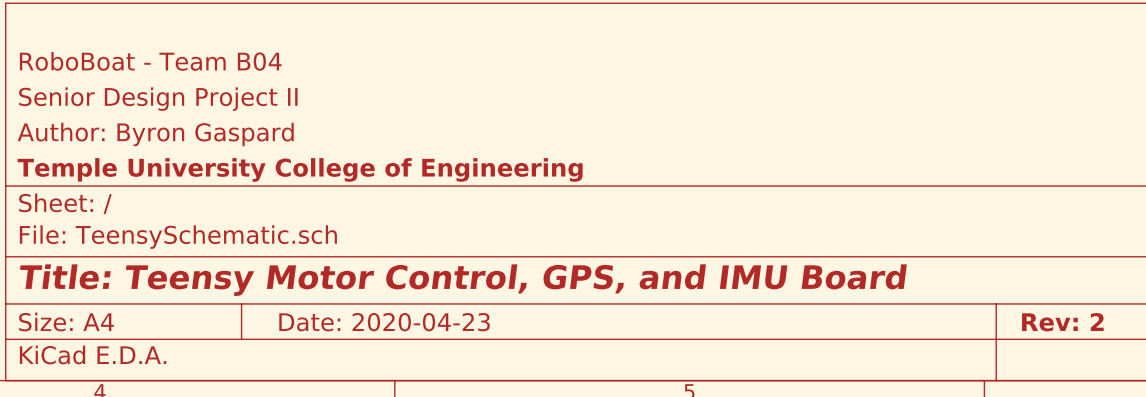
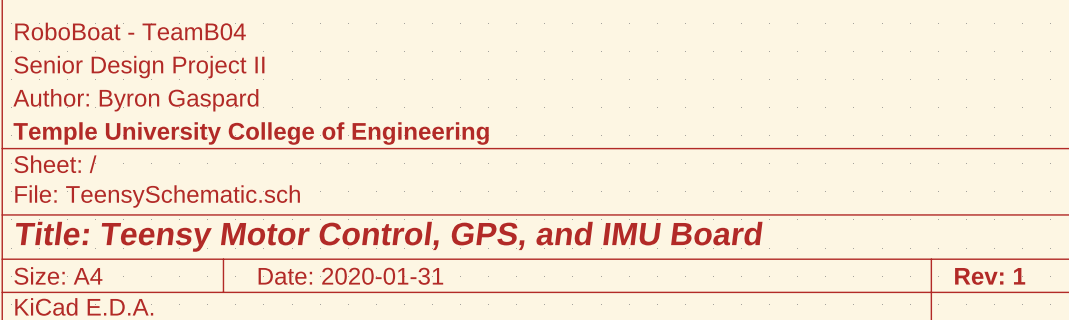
title block: RoboBoat - Team B04 (150, 61) -> RoboBoat - TeamB04 (130, 31)
title block: Date: 2020-04-23 (384, 322) -> Date: 2020-01-31 (350, 276)
title block: Rev: 2 (1062, 322) -> Rev: 1 (990, 276)

